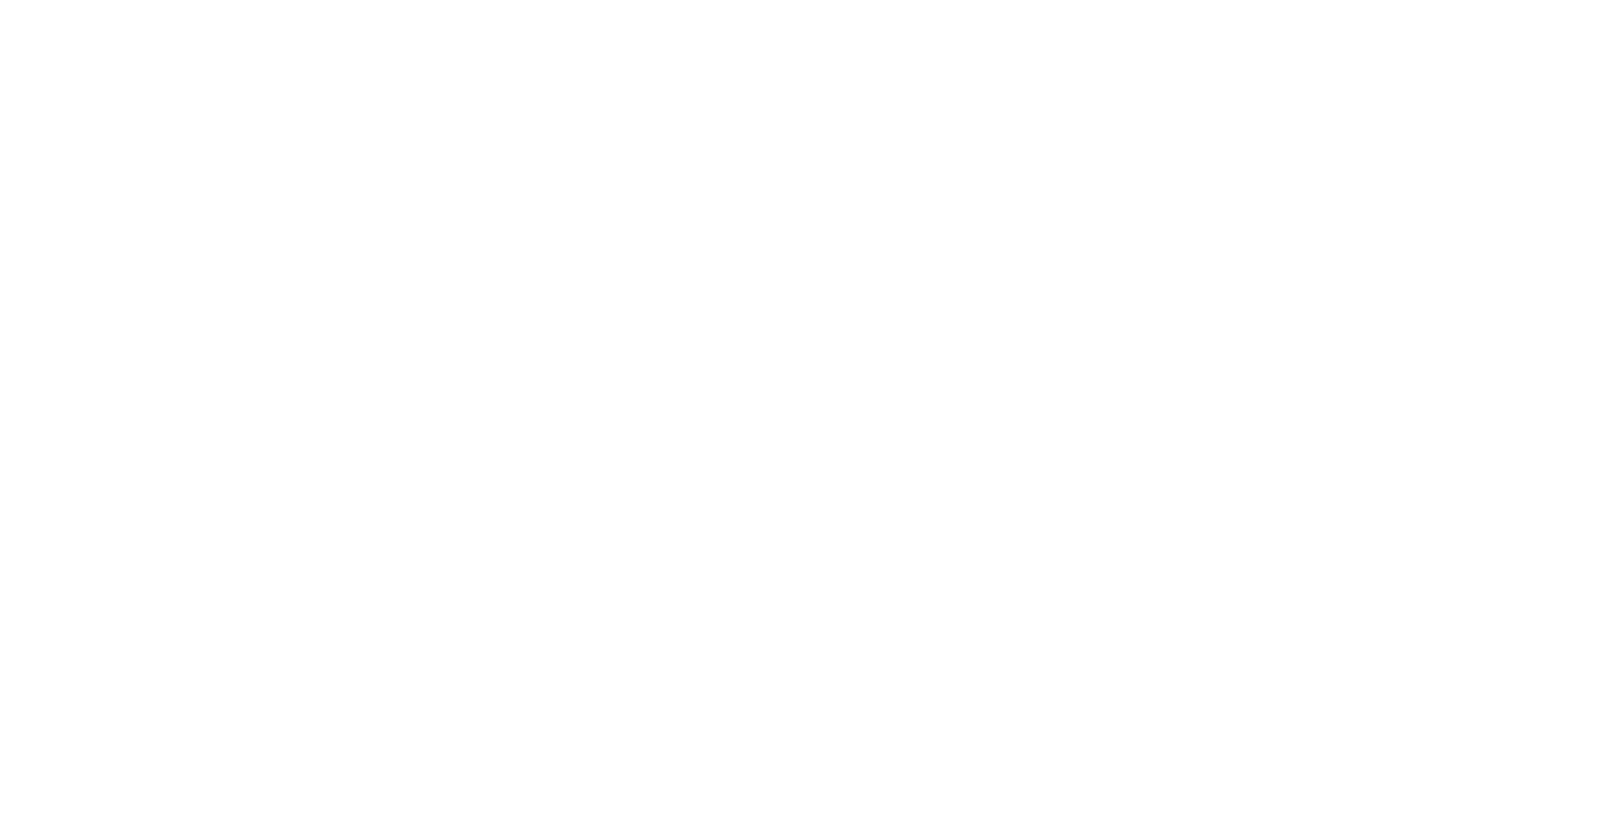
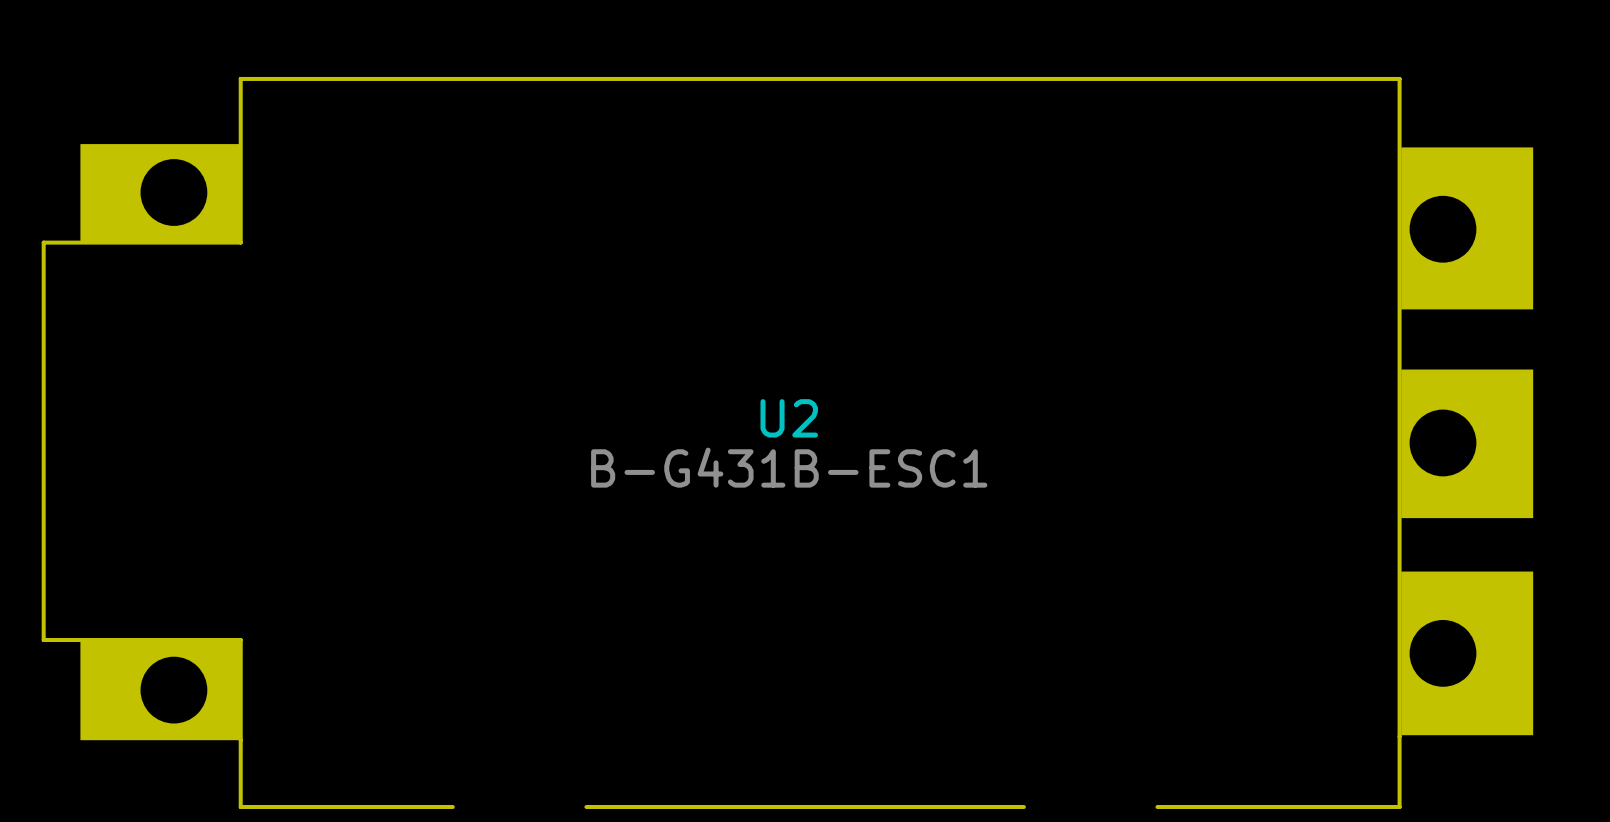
U2: none -> B-G431B-ESC1 (787, 442)

